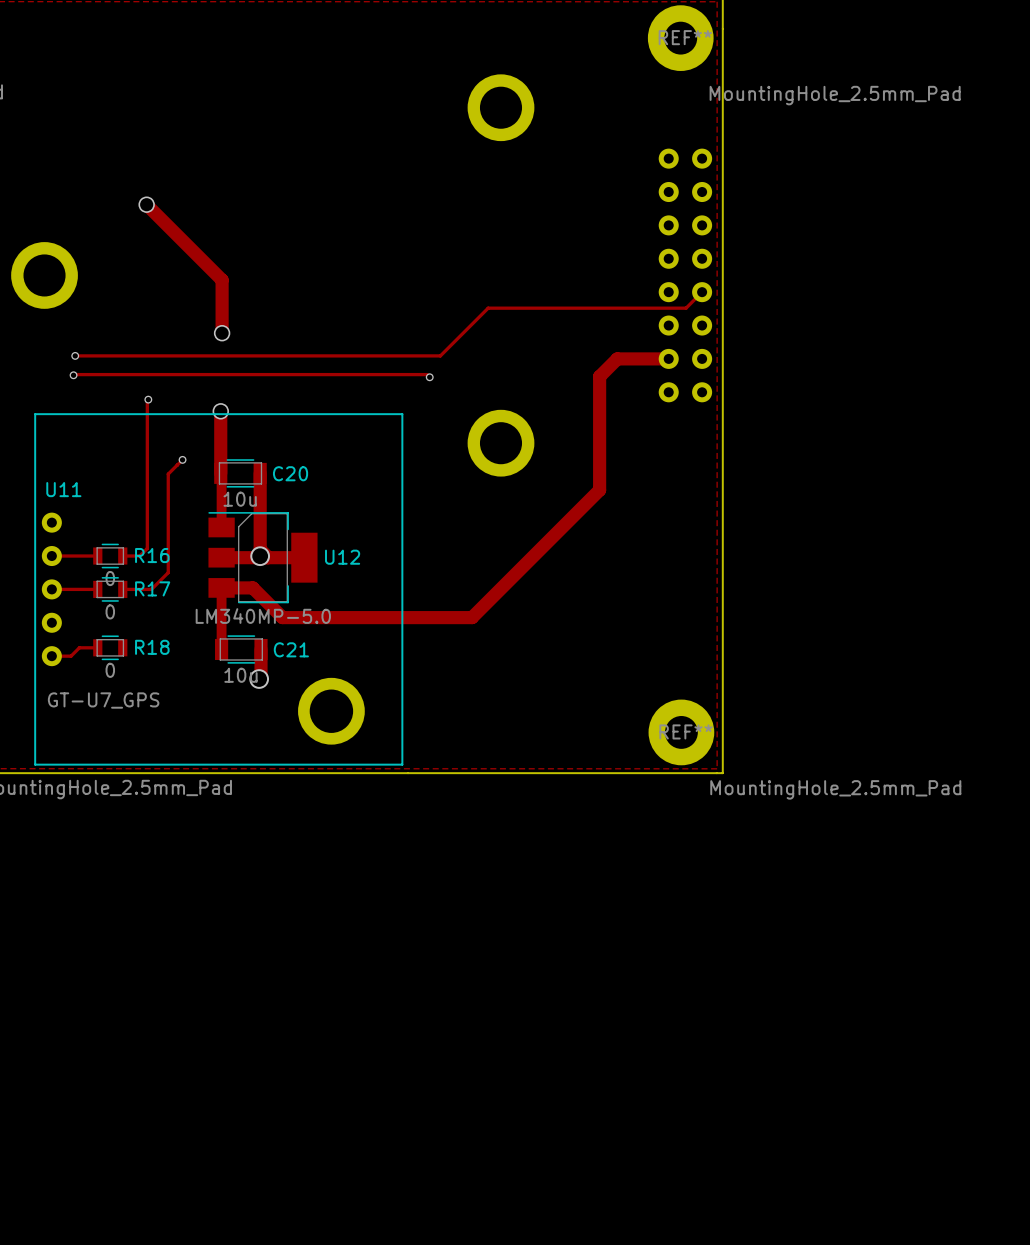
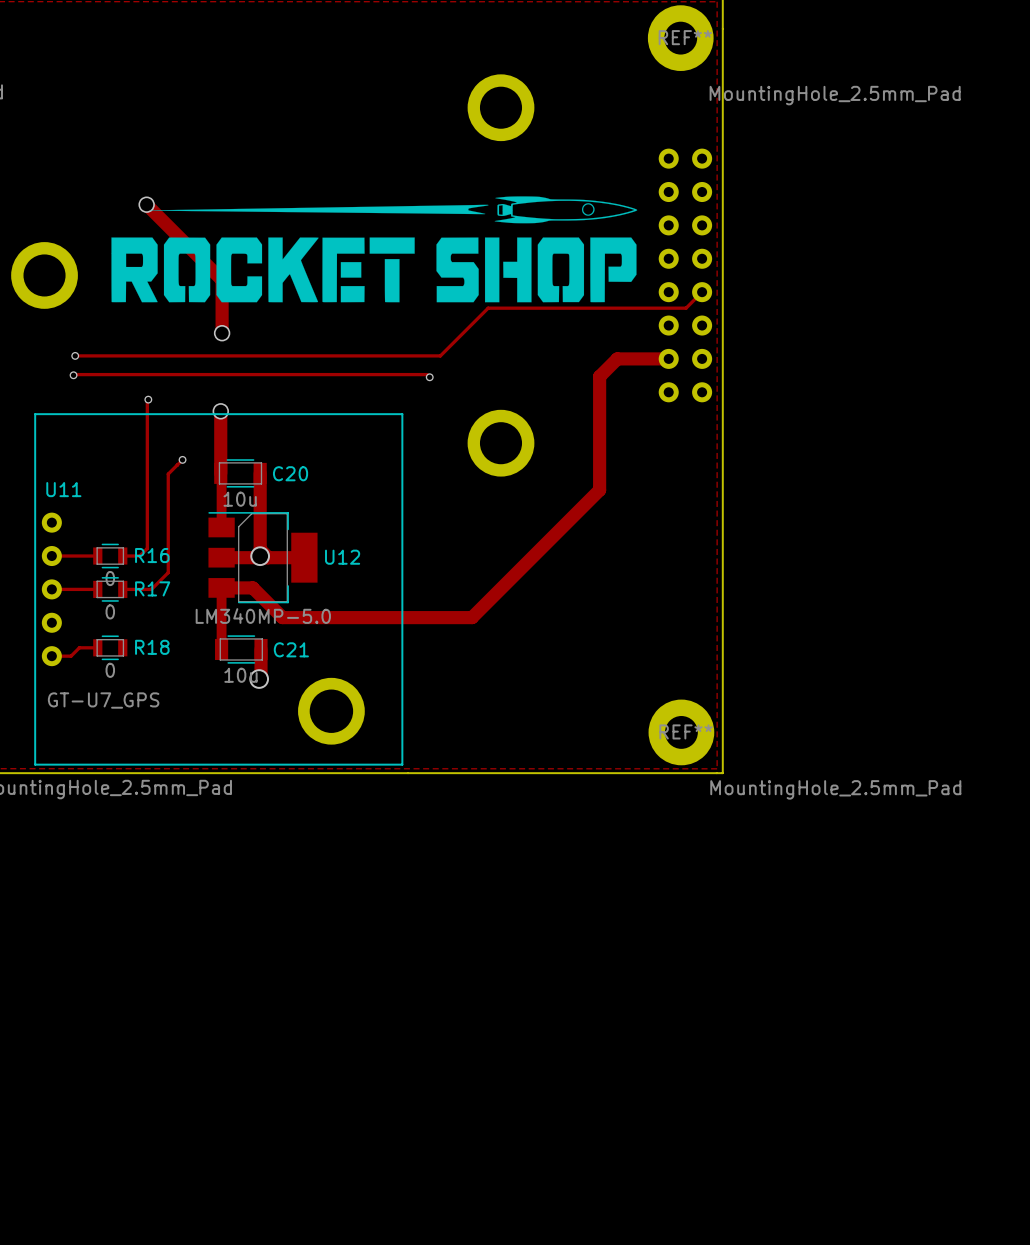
drawing: none -> [111, 196, 638, 303]

